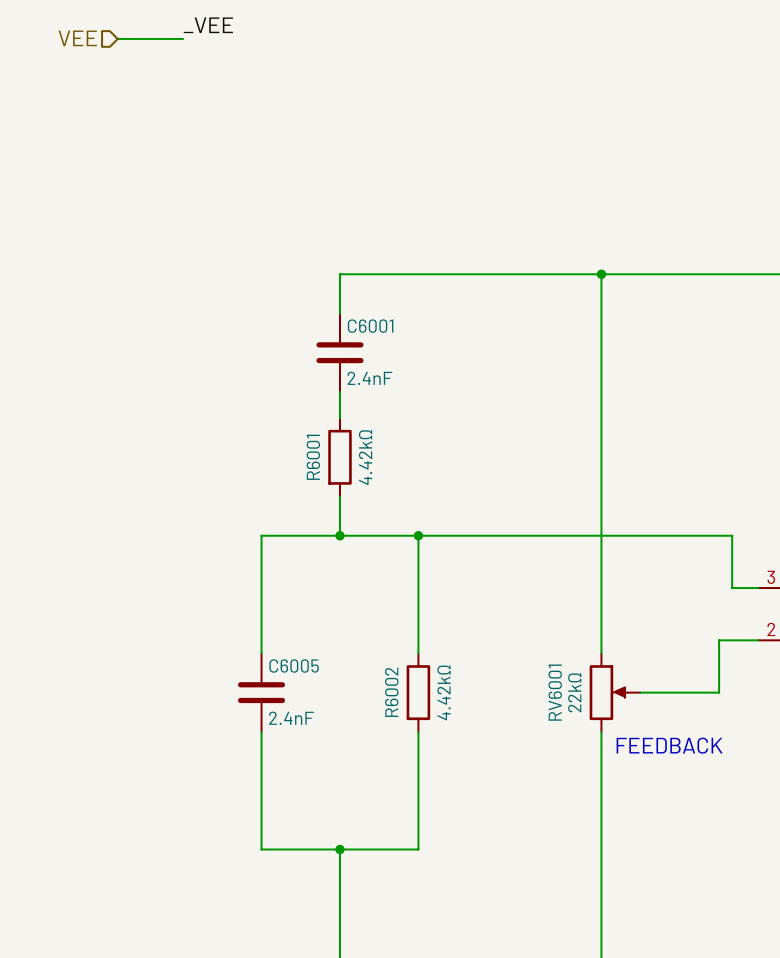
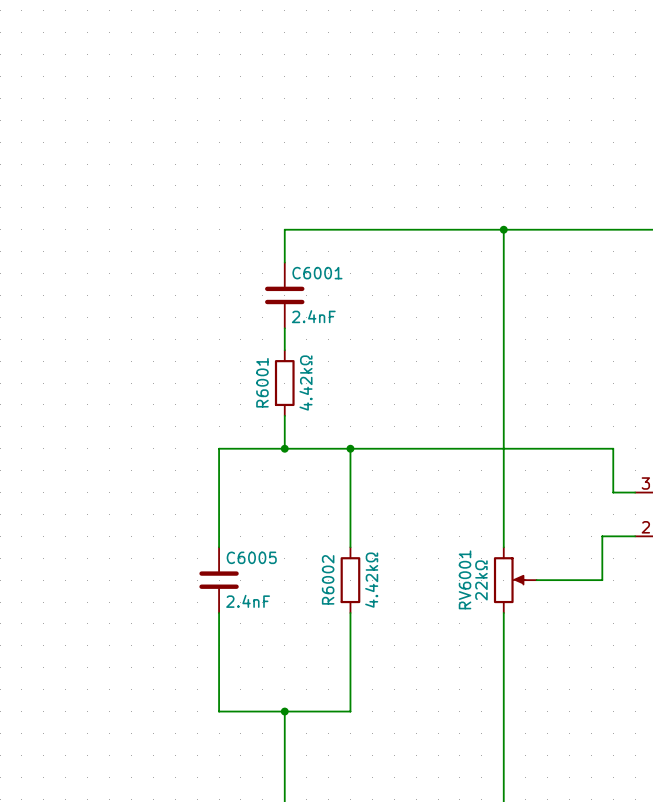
label: _VEE (208, 25) -> none
hierarchical label: VEE (77, 38) -> none
wire: (117, 38) (183, 38) -> none
text: FEEDBACK (669, 745) -> none

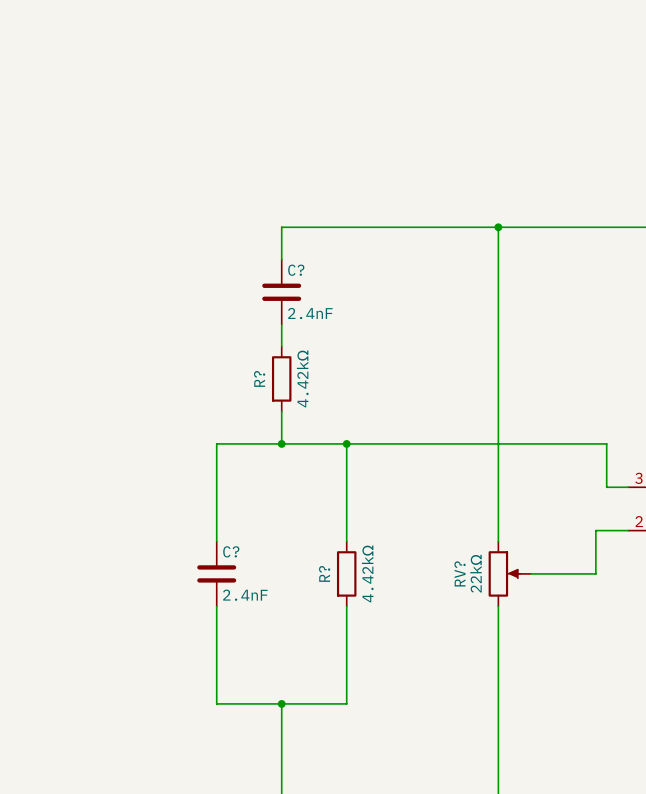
C6001 name: C6001 (317, 273) -> C? (296, 270)
R6001 name: R6001 (262, 382) -> R? (259, 378)
C6005 name: C6005 (251, 557) -> C? (231, 551)
R6002 name: R6002 (328, 579) -> R? (324, 573)
RV6001 name: RV6001 (465, 579) -> RV? (460, 573)

